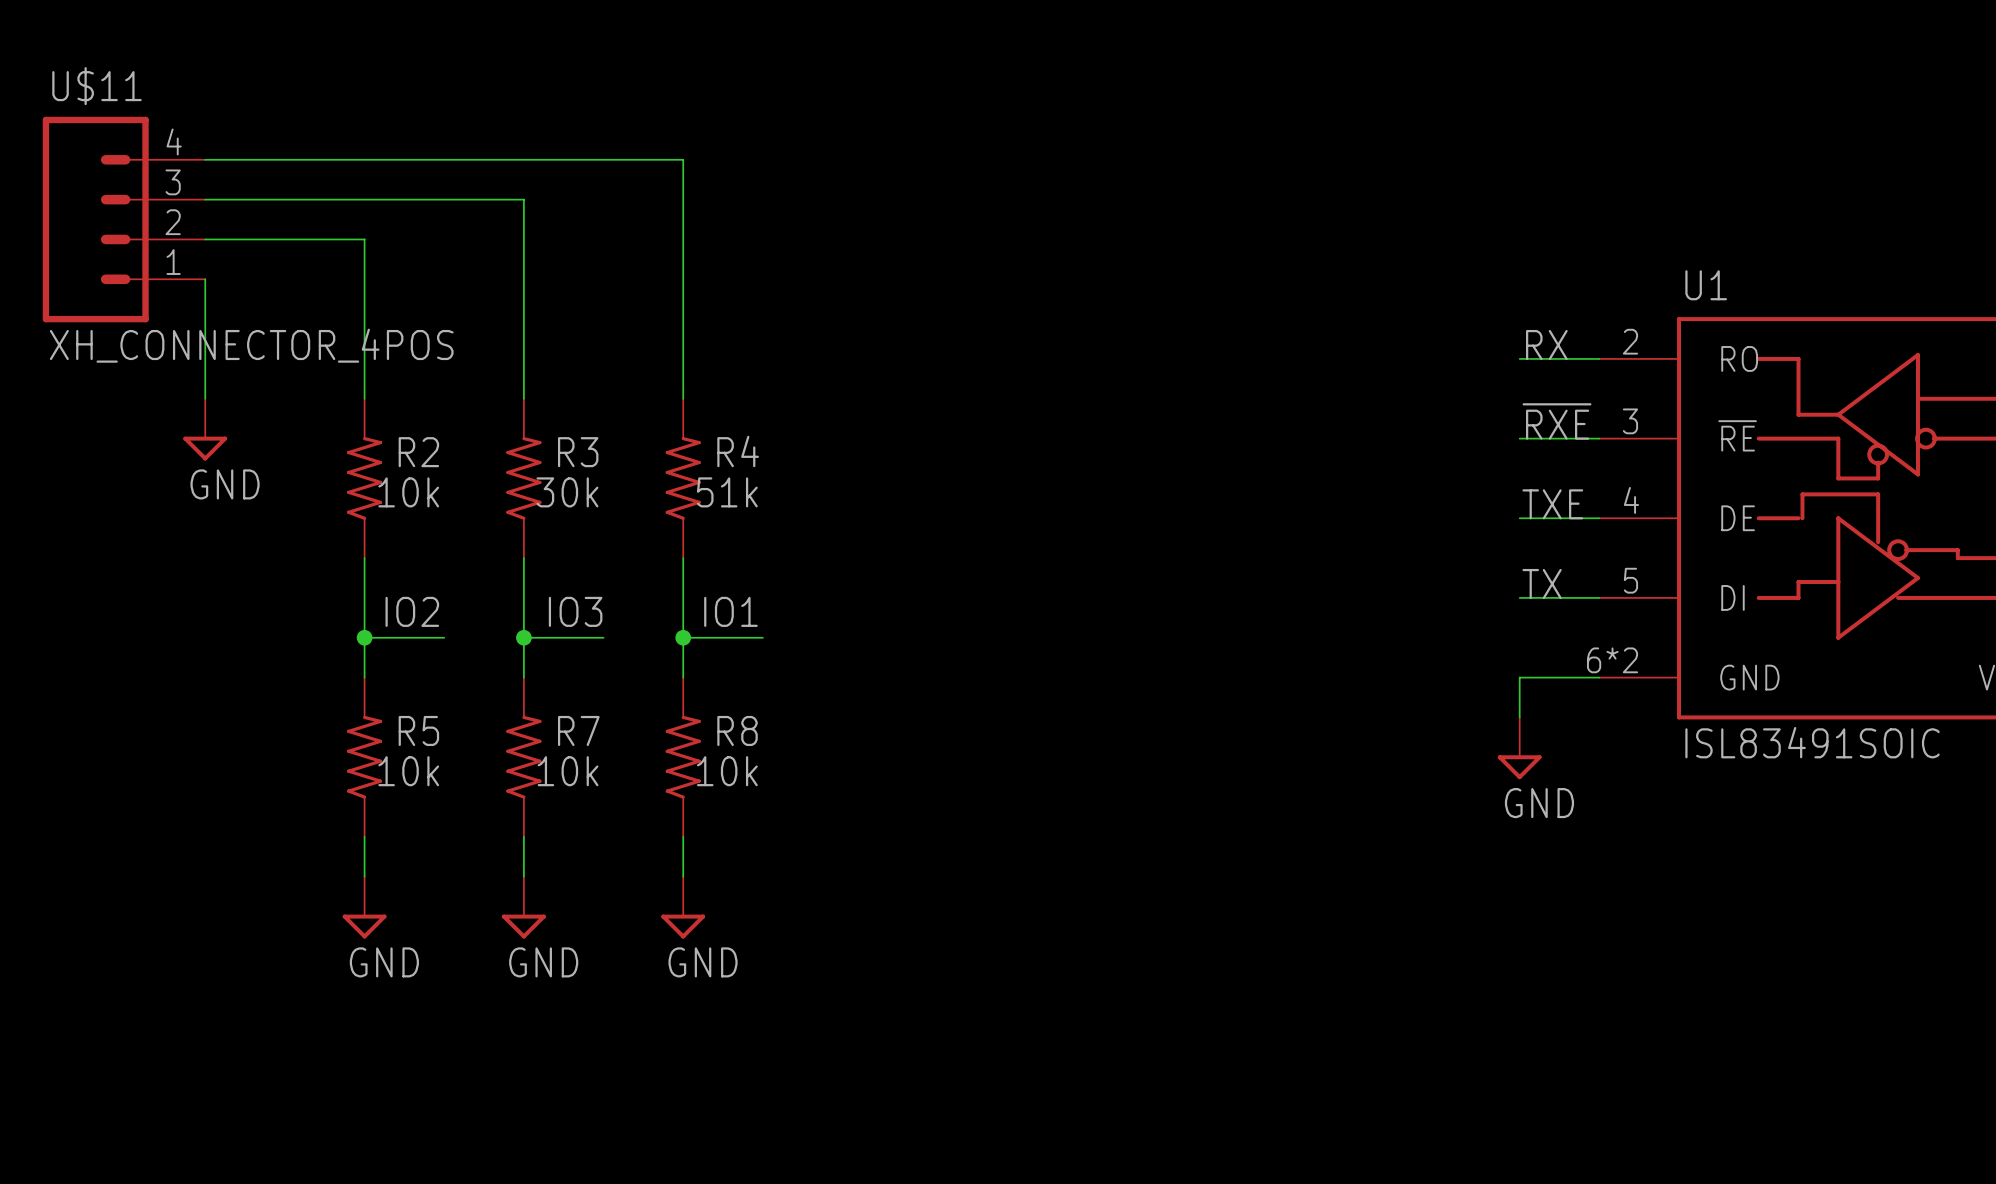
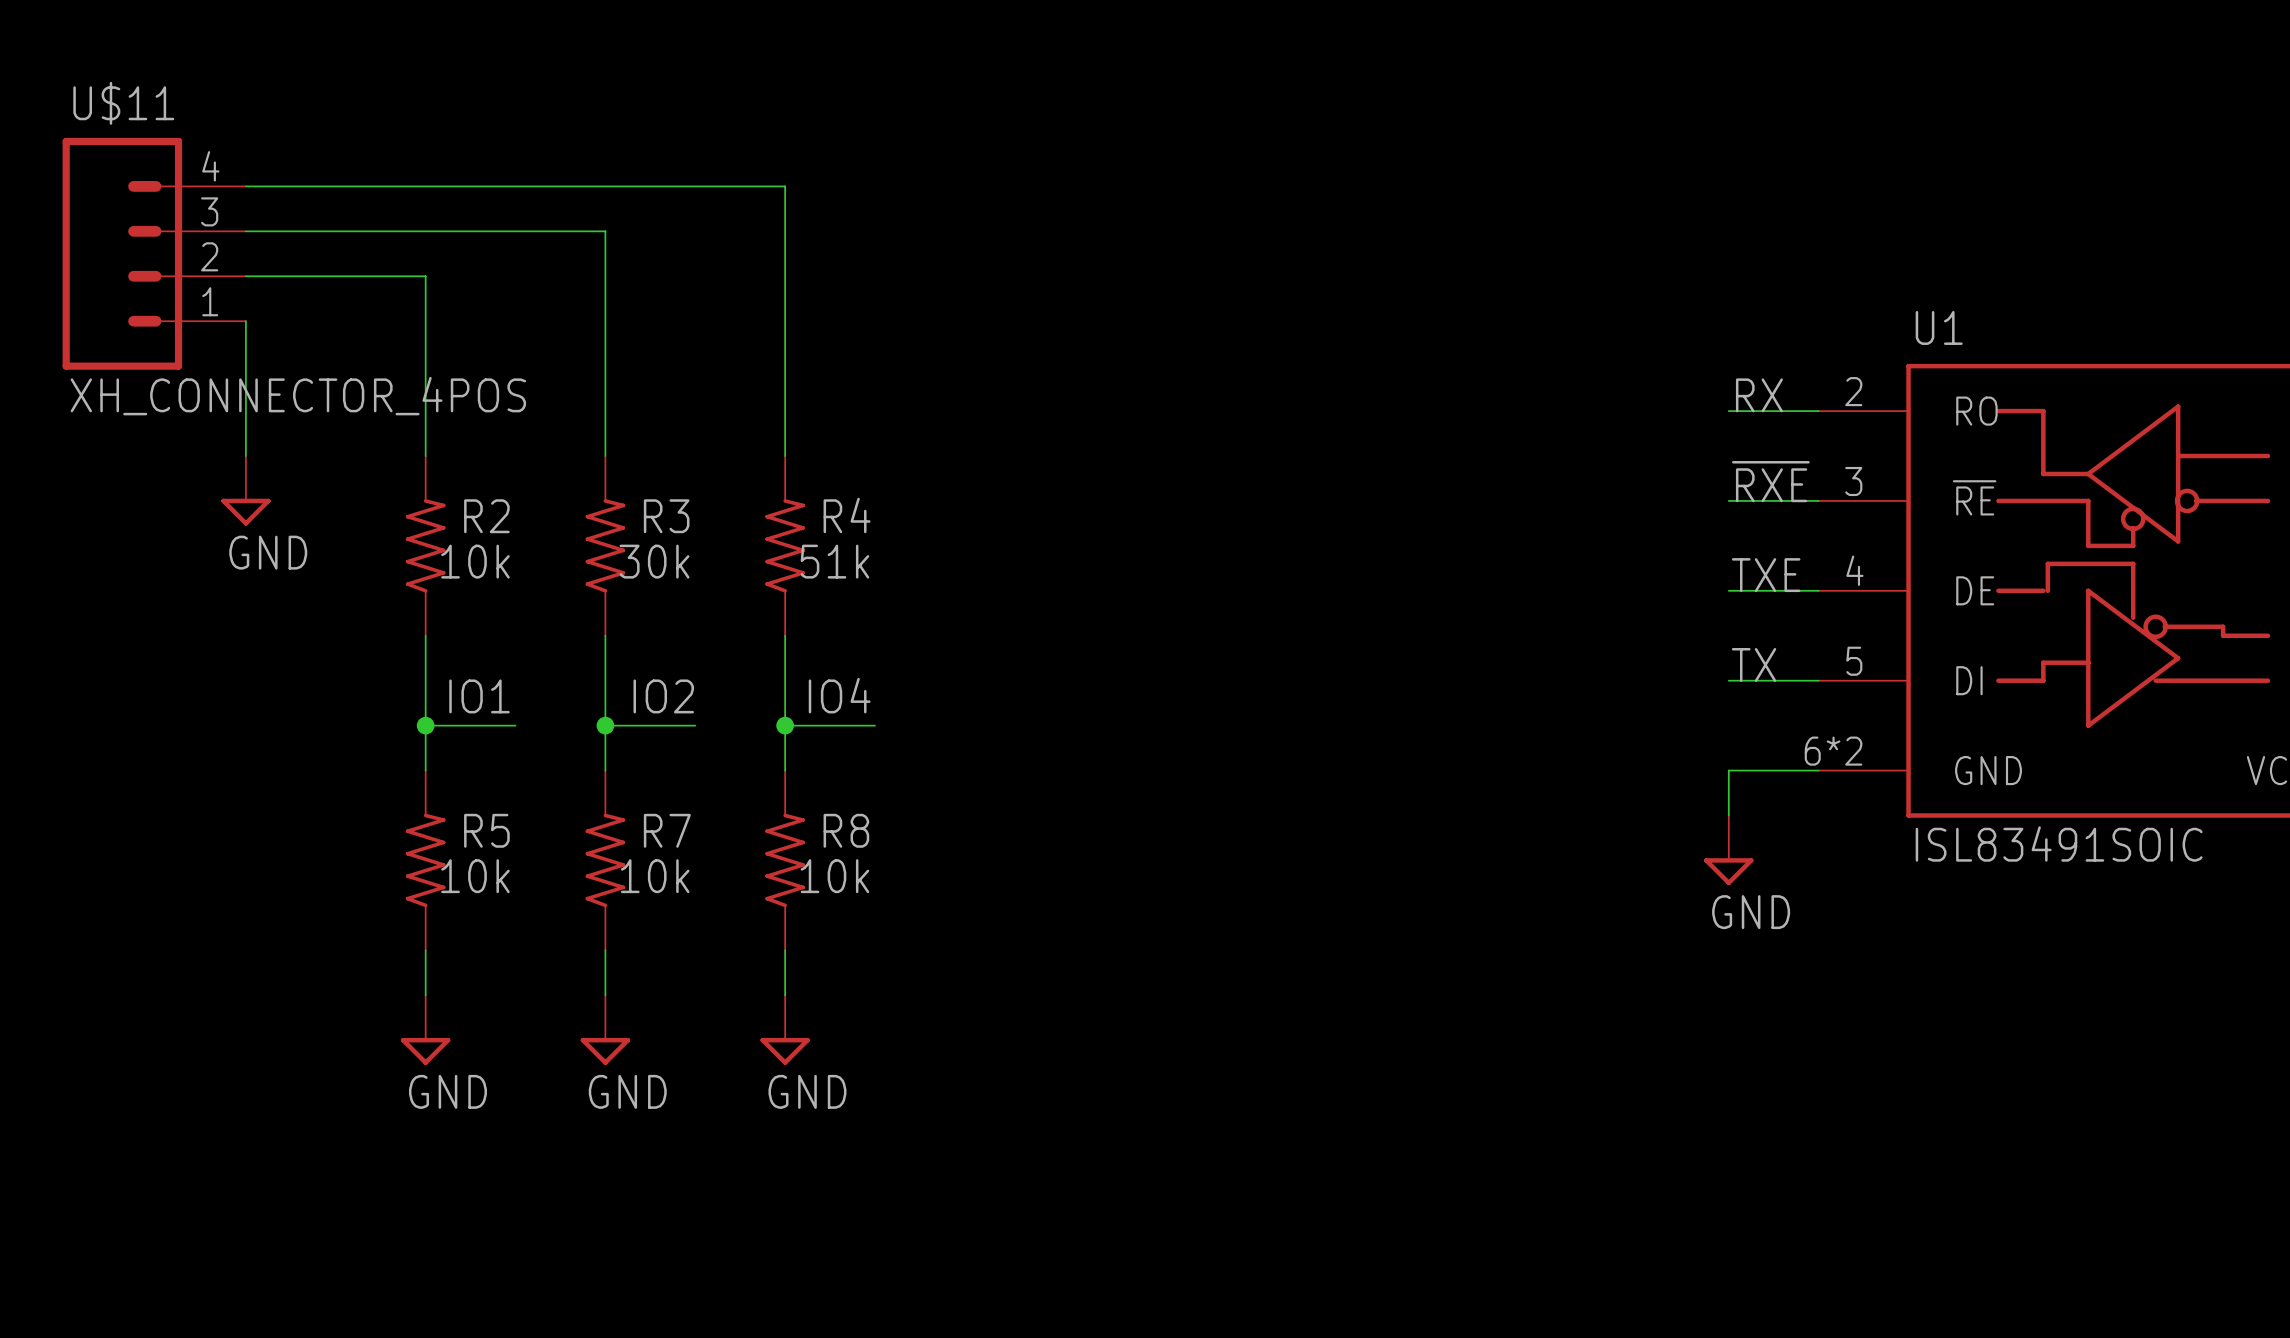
label: IO2 (412, 611) -> IO1 (479, 696)
label: IO3 (575, 611) -> IO2 (663, 696)
label: IO1 (730, 611) -> IO4 (839, 695)

